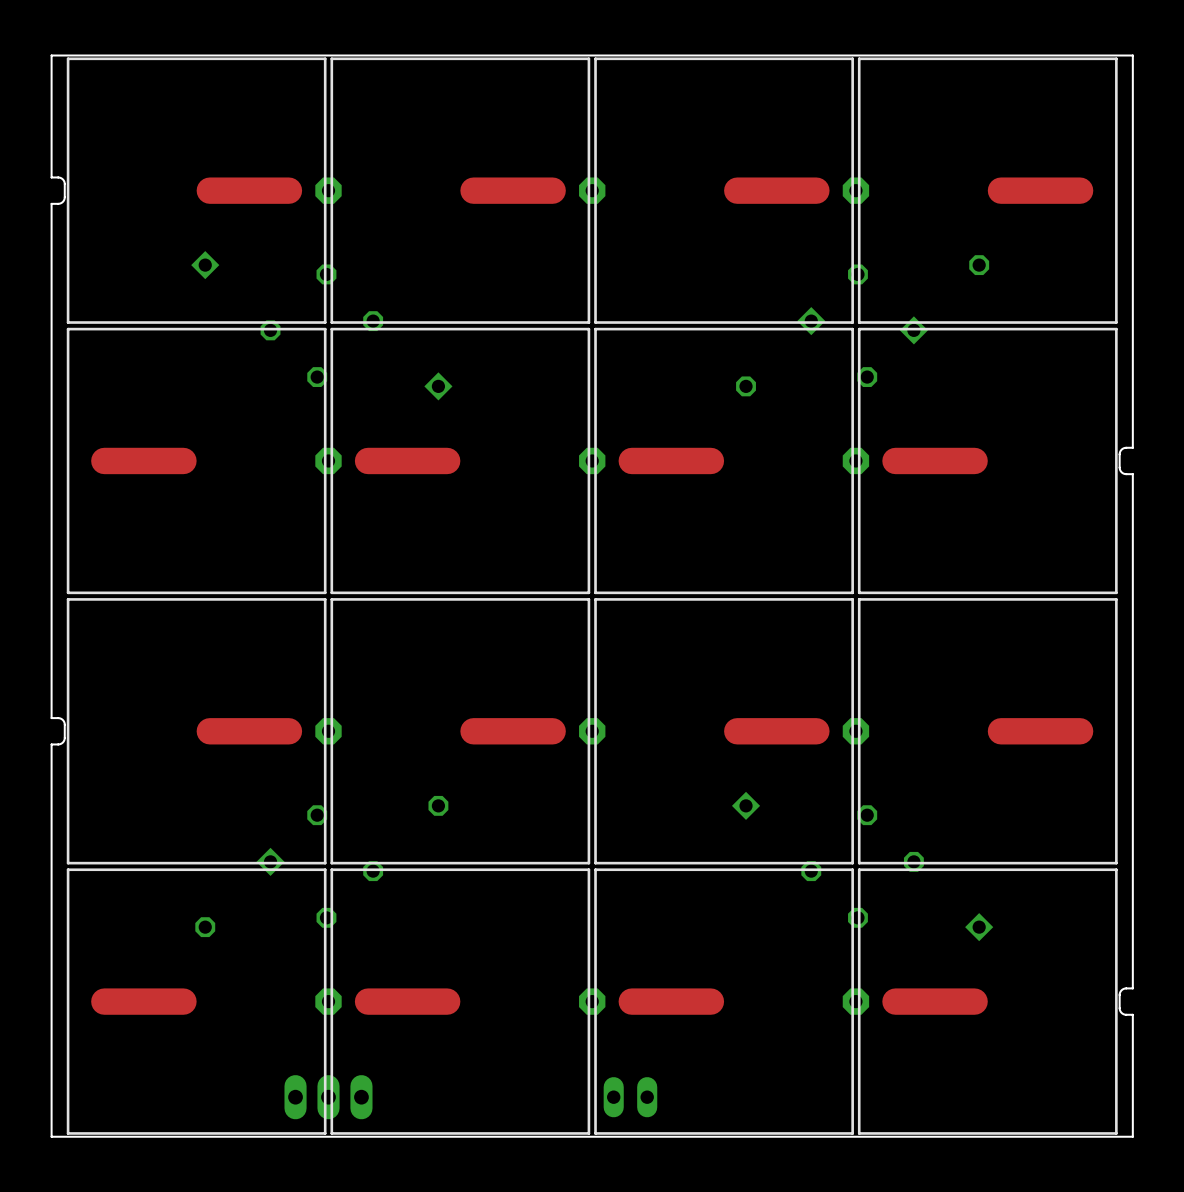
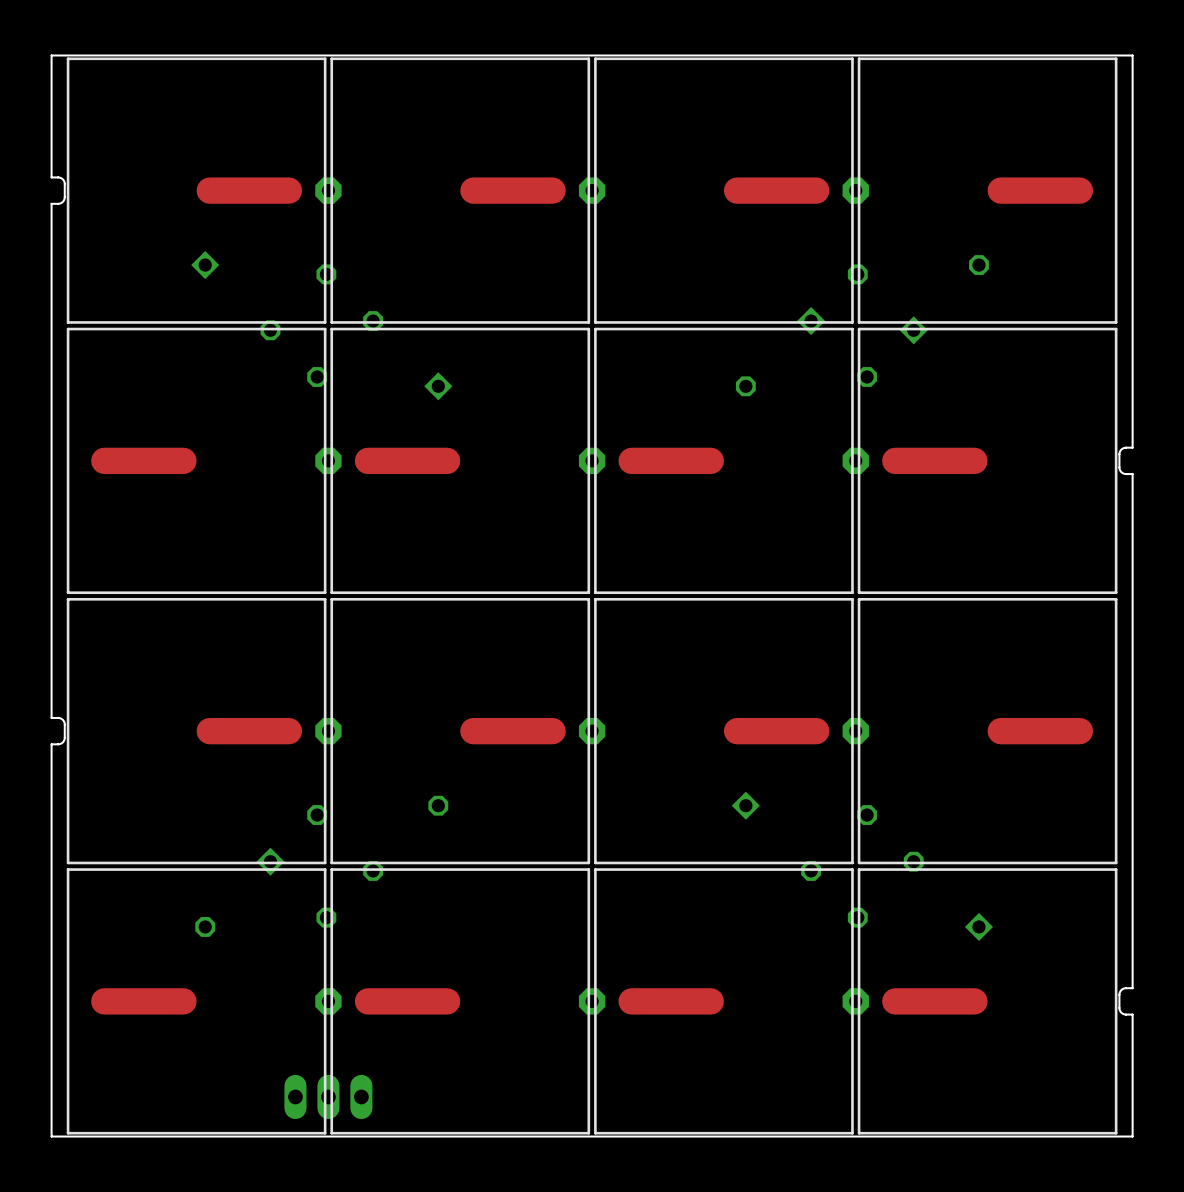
part: (630, 1097) -> none

